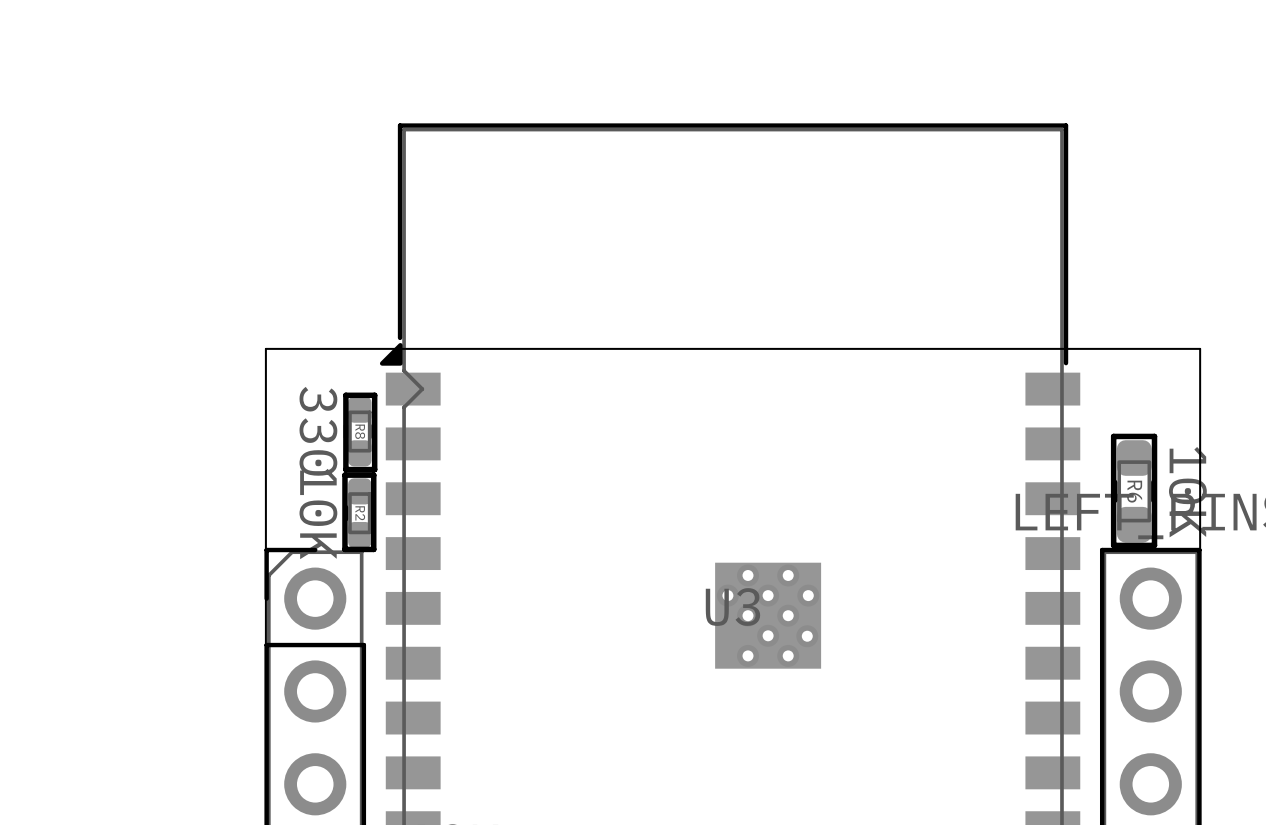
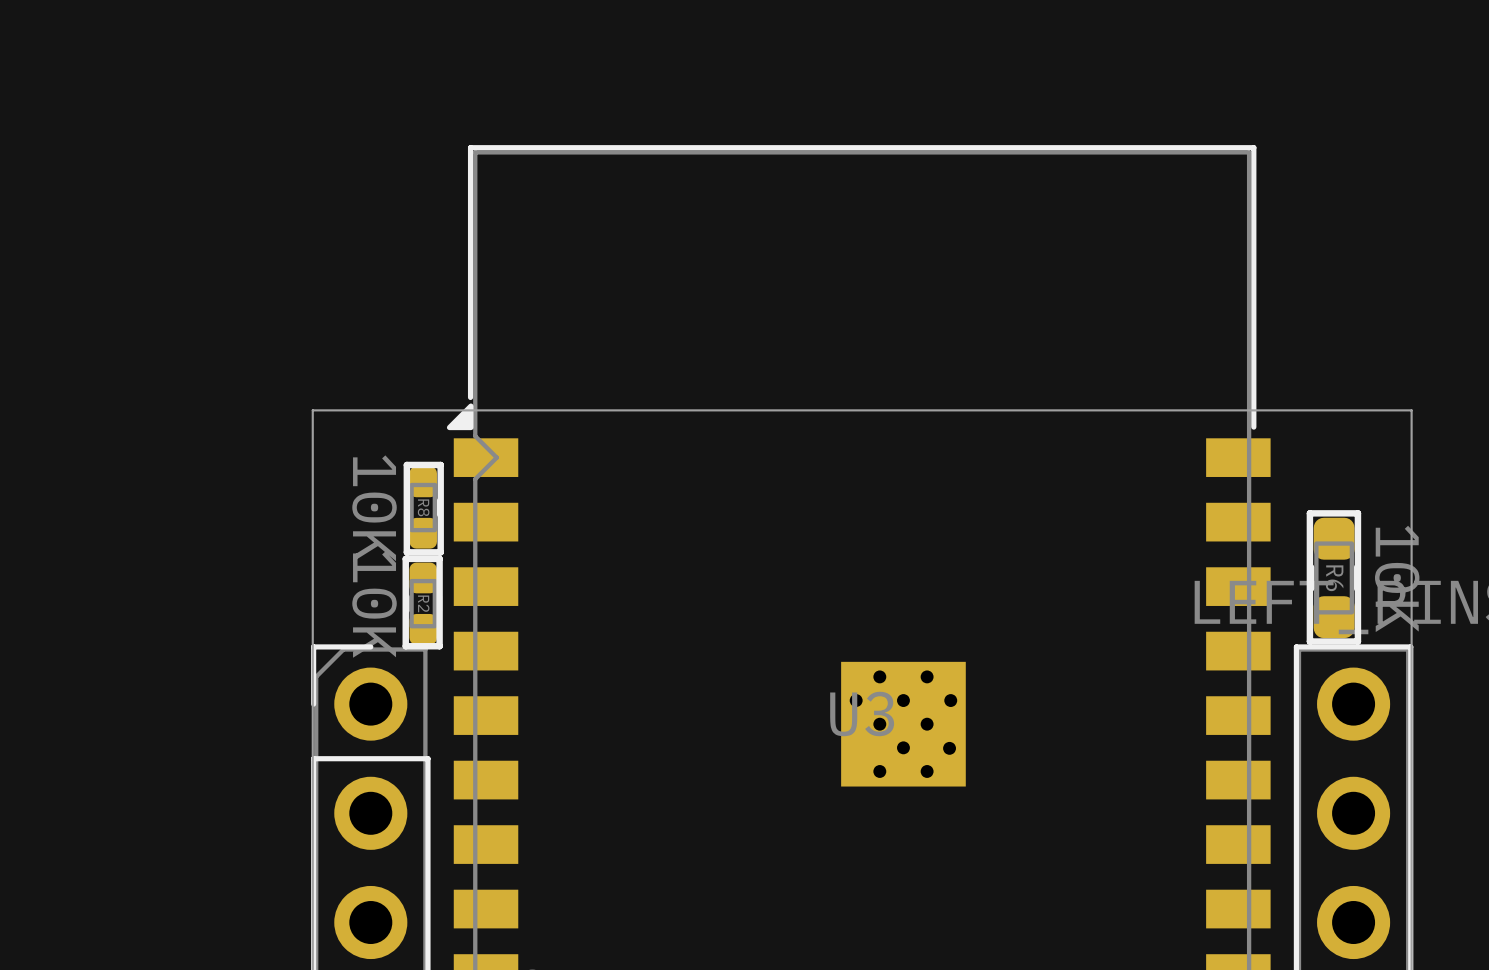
R8 value: 330 (318, 431) -> 10K (374, 508)

